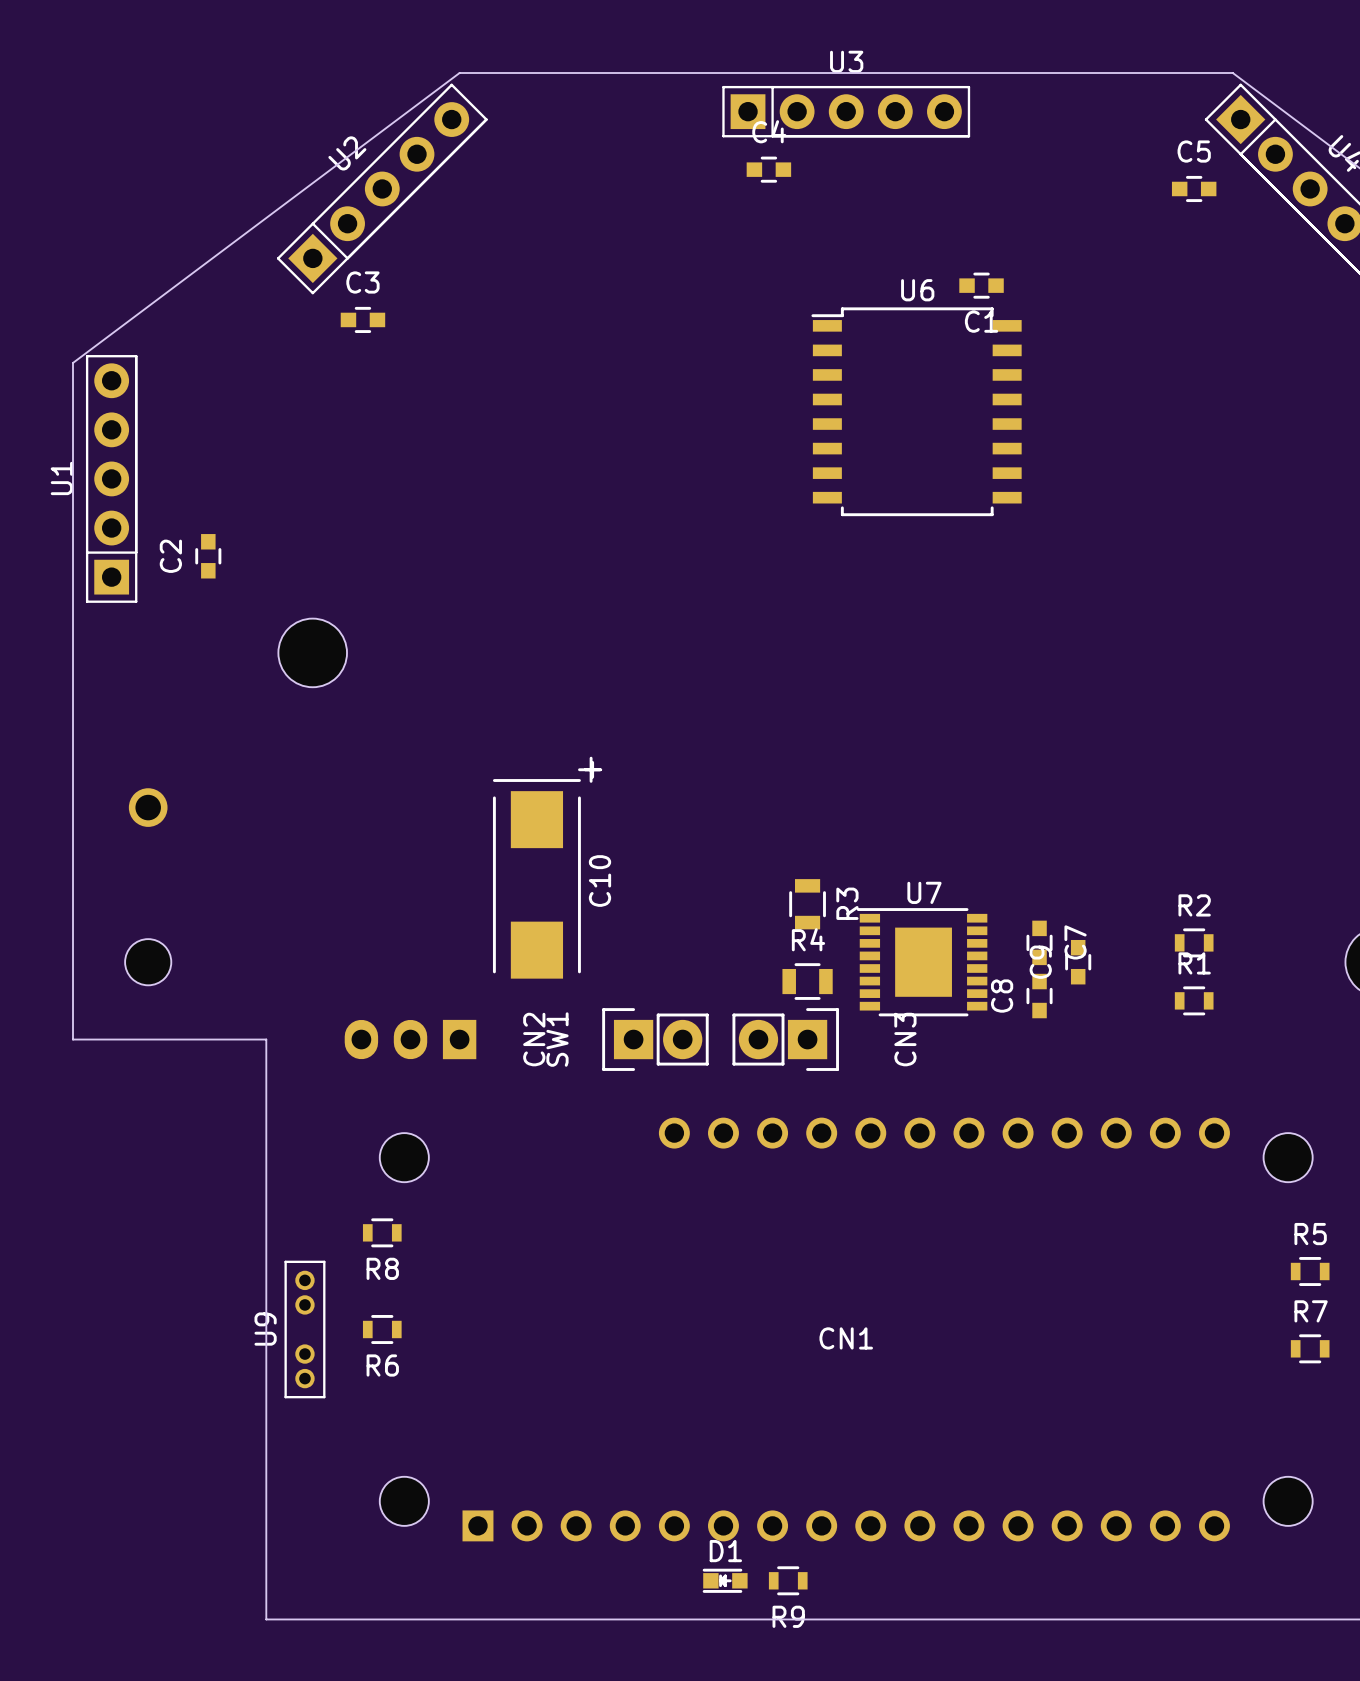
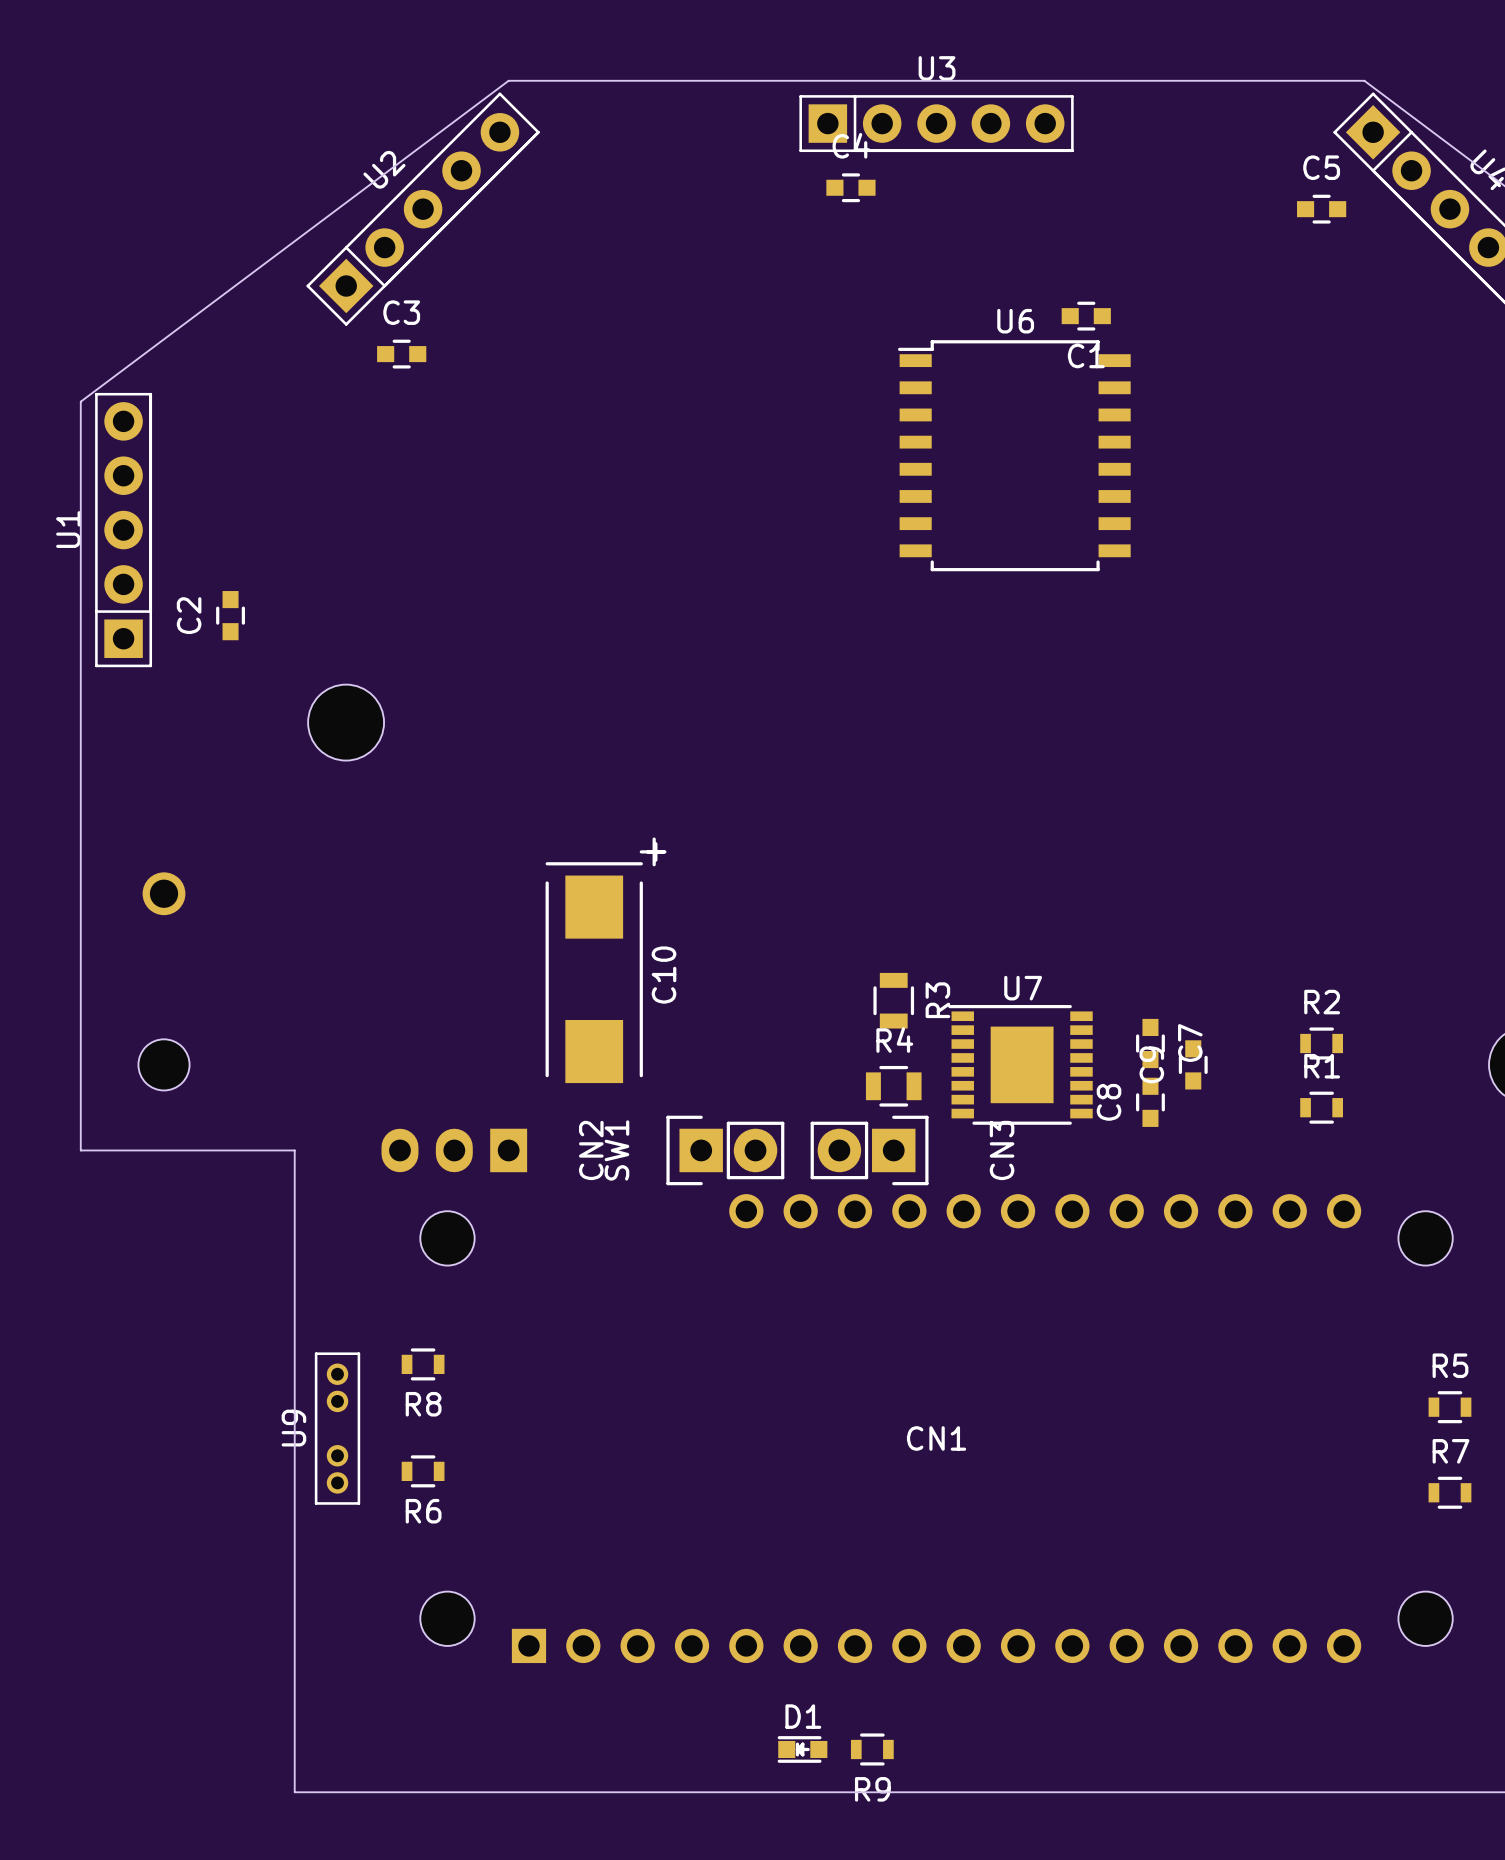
U9 position: (304, 1329) -> (337, 1428)
CN1 position: (846, 1329) -> (936, 1428)

